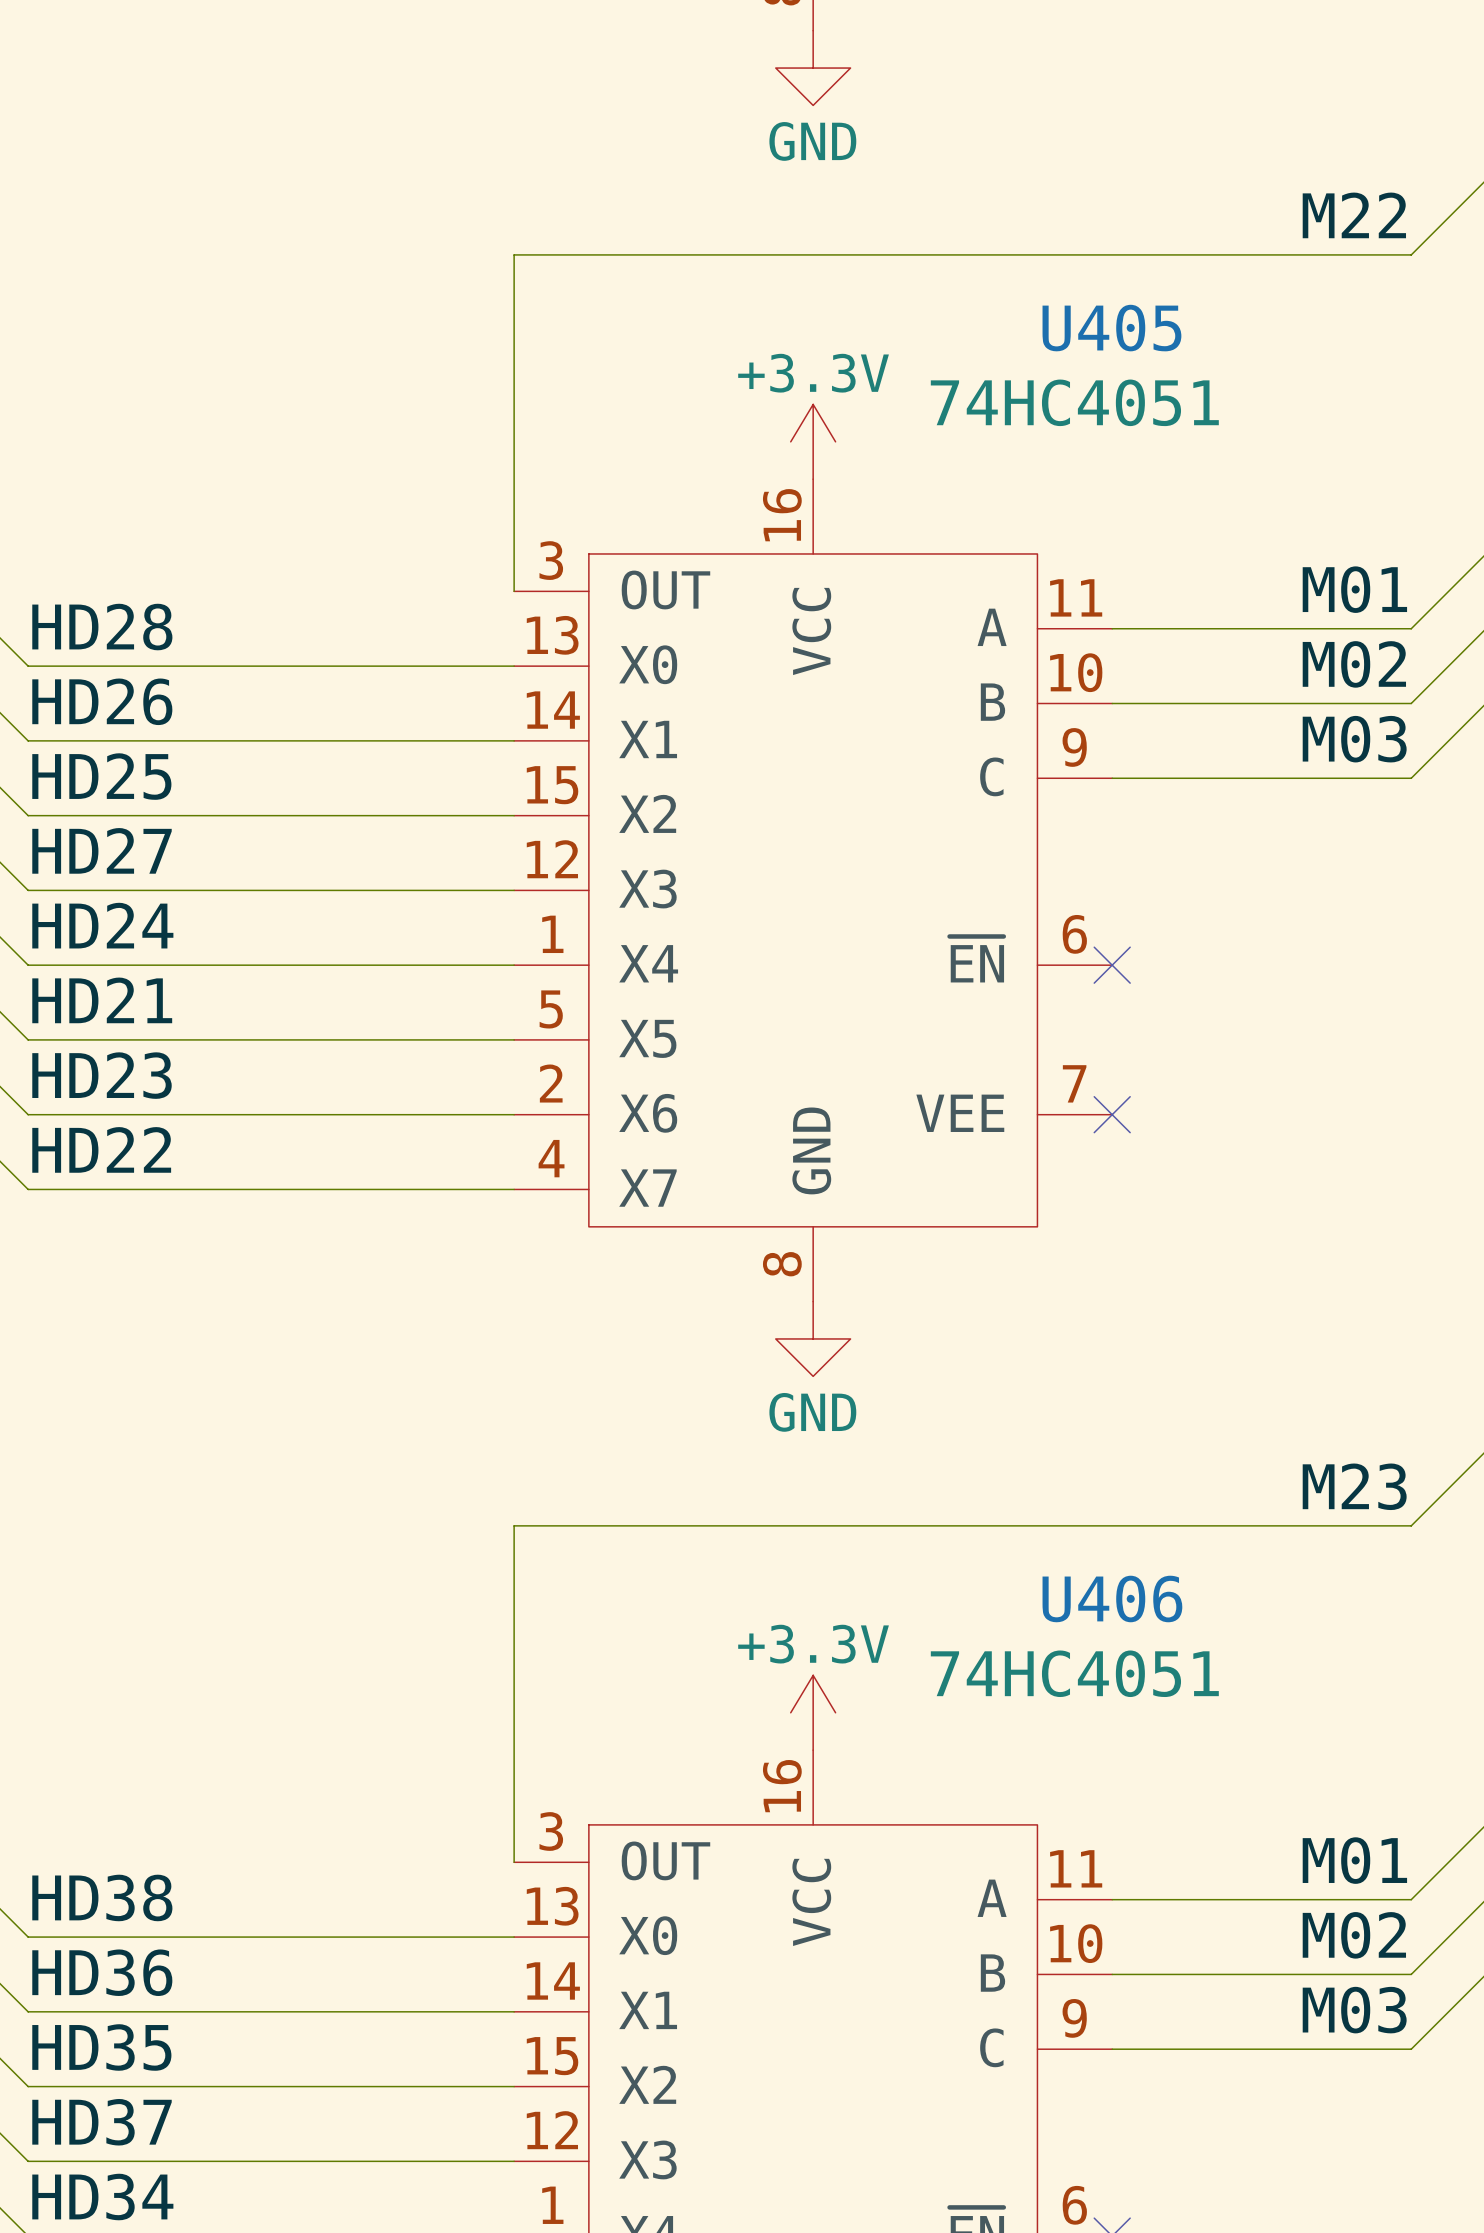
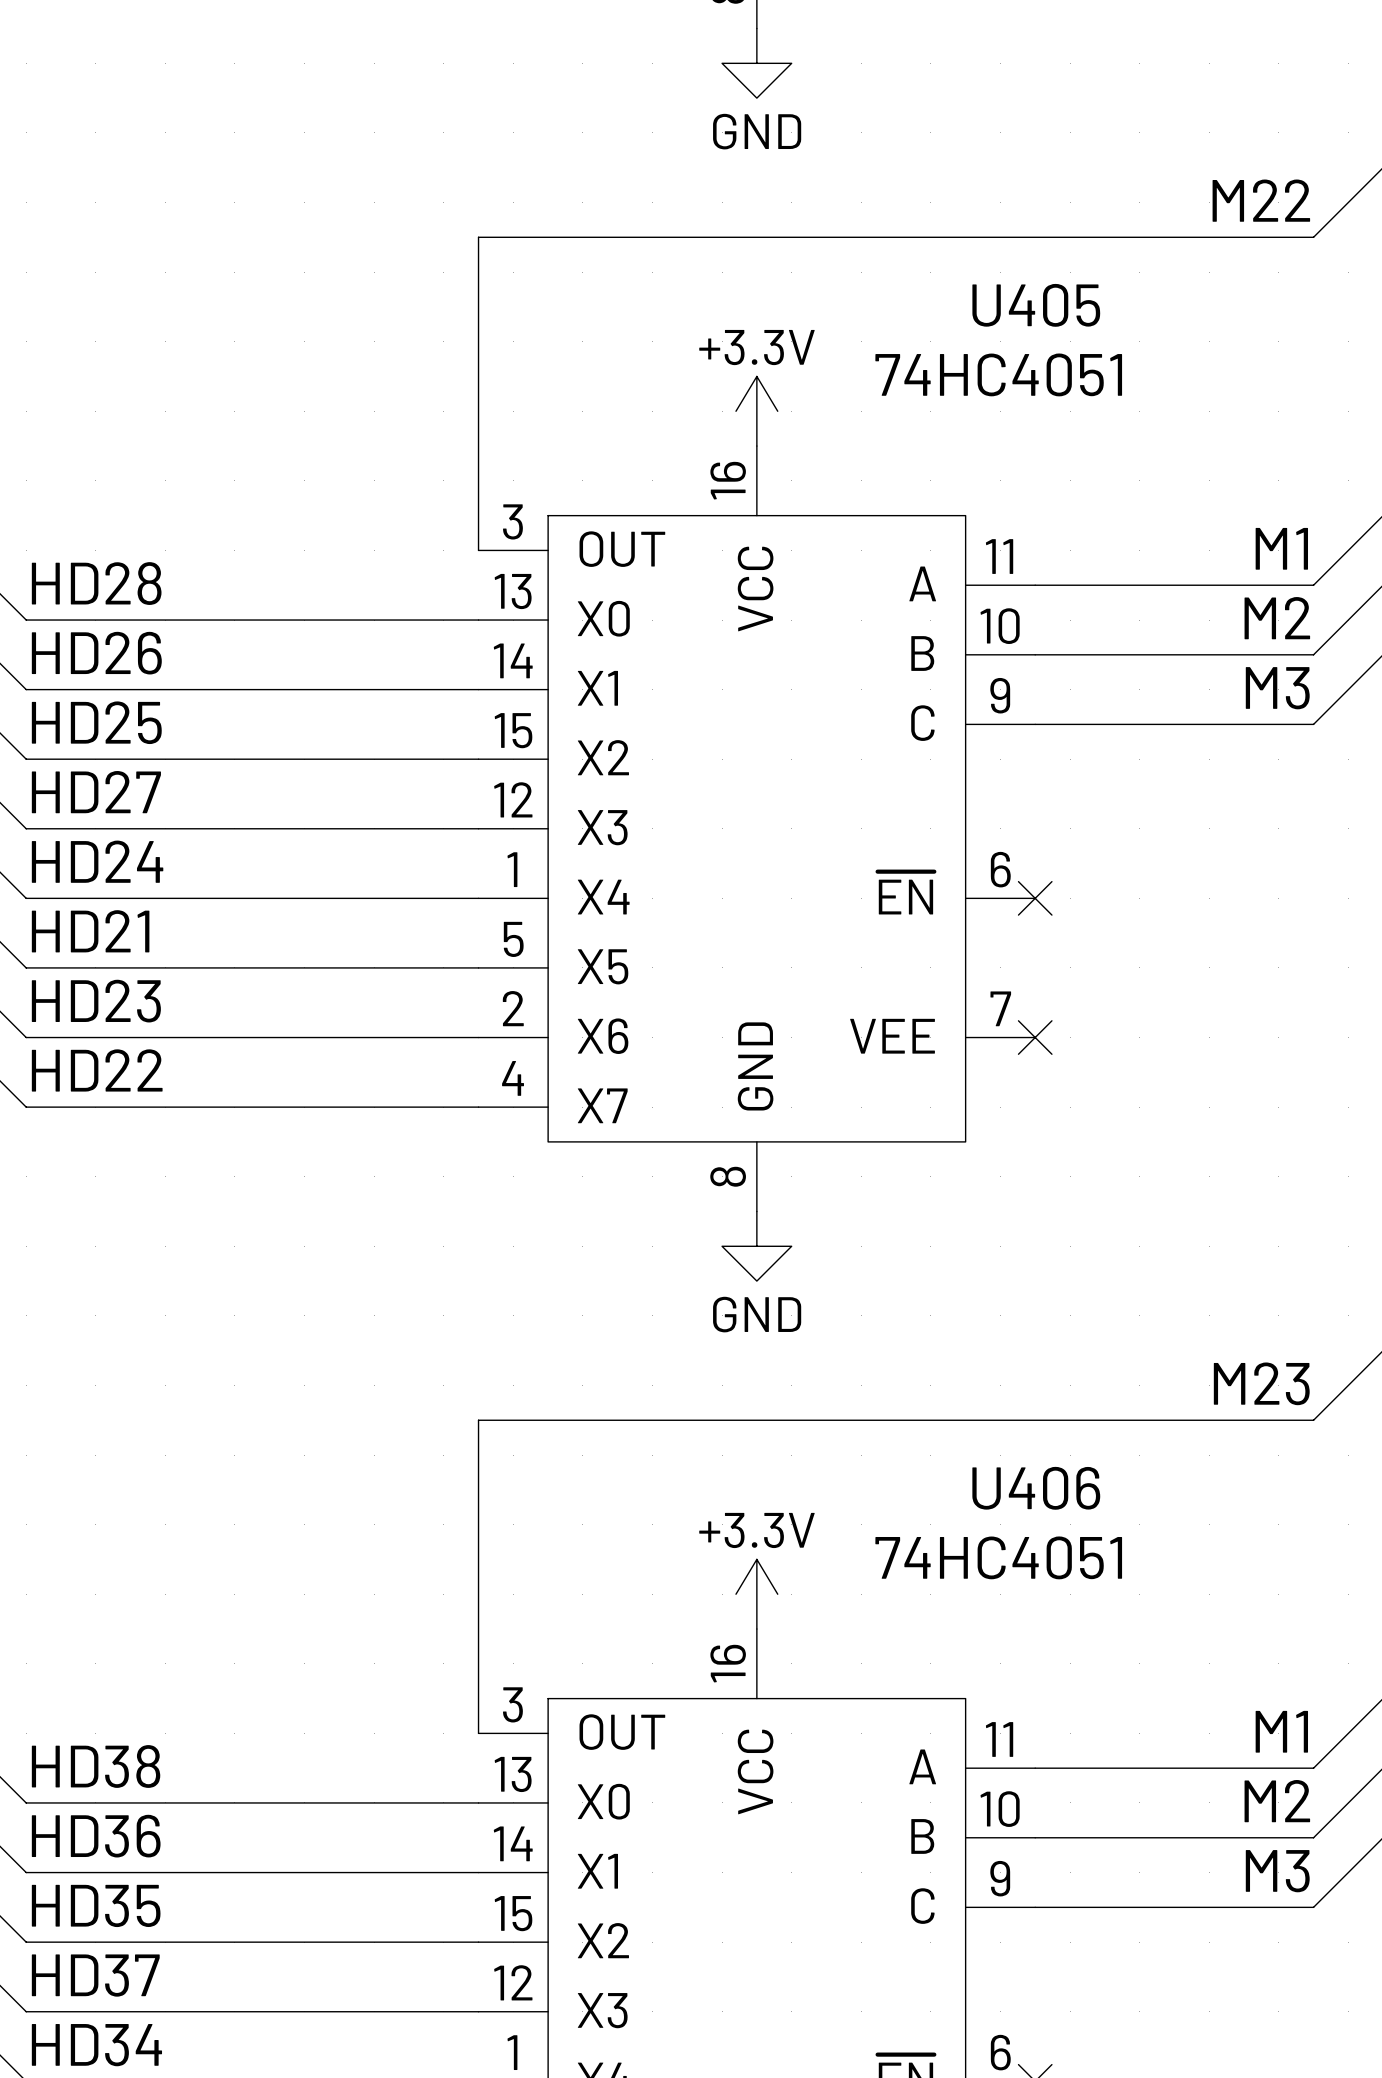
label: M01 (1354, 589) -> M1 (1281, 548)
label: M02 (1354, 664) -> M2 (1277, 618)
label: M03 (1354, 739) -> M3 (1277, 688)
label: M01 (1354, 1860) -> M1 (1281, 1731)
label: M02 (1354, 1935) -> M2 (1277, 1801)
label: M03 (1354, 2010) -> M3 (1277, 1871)

